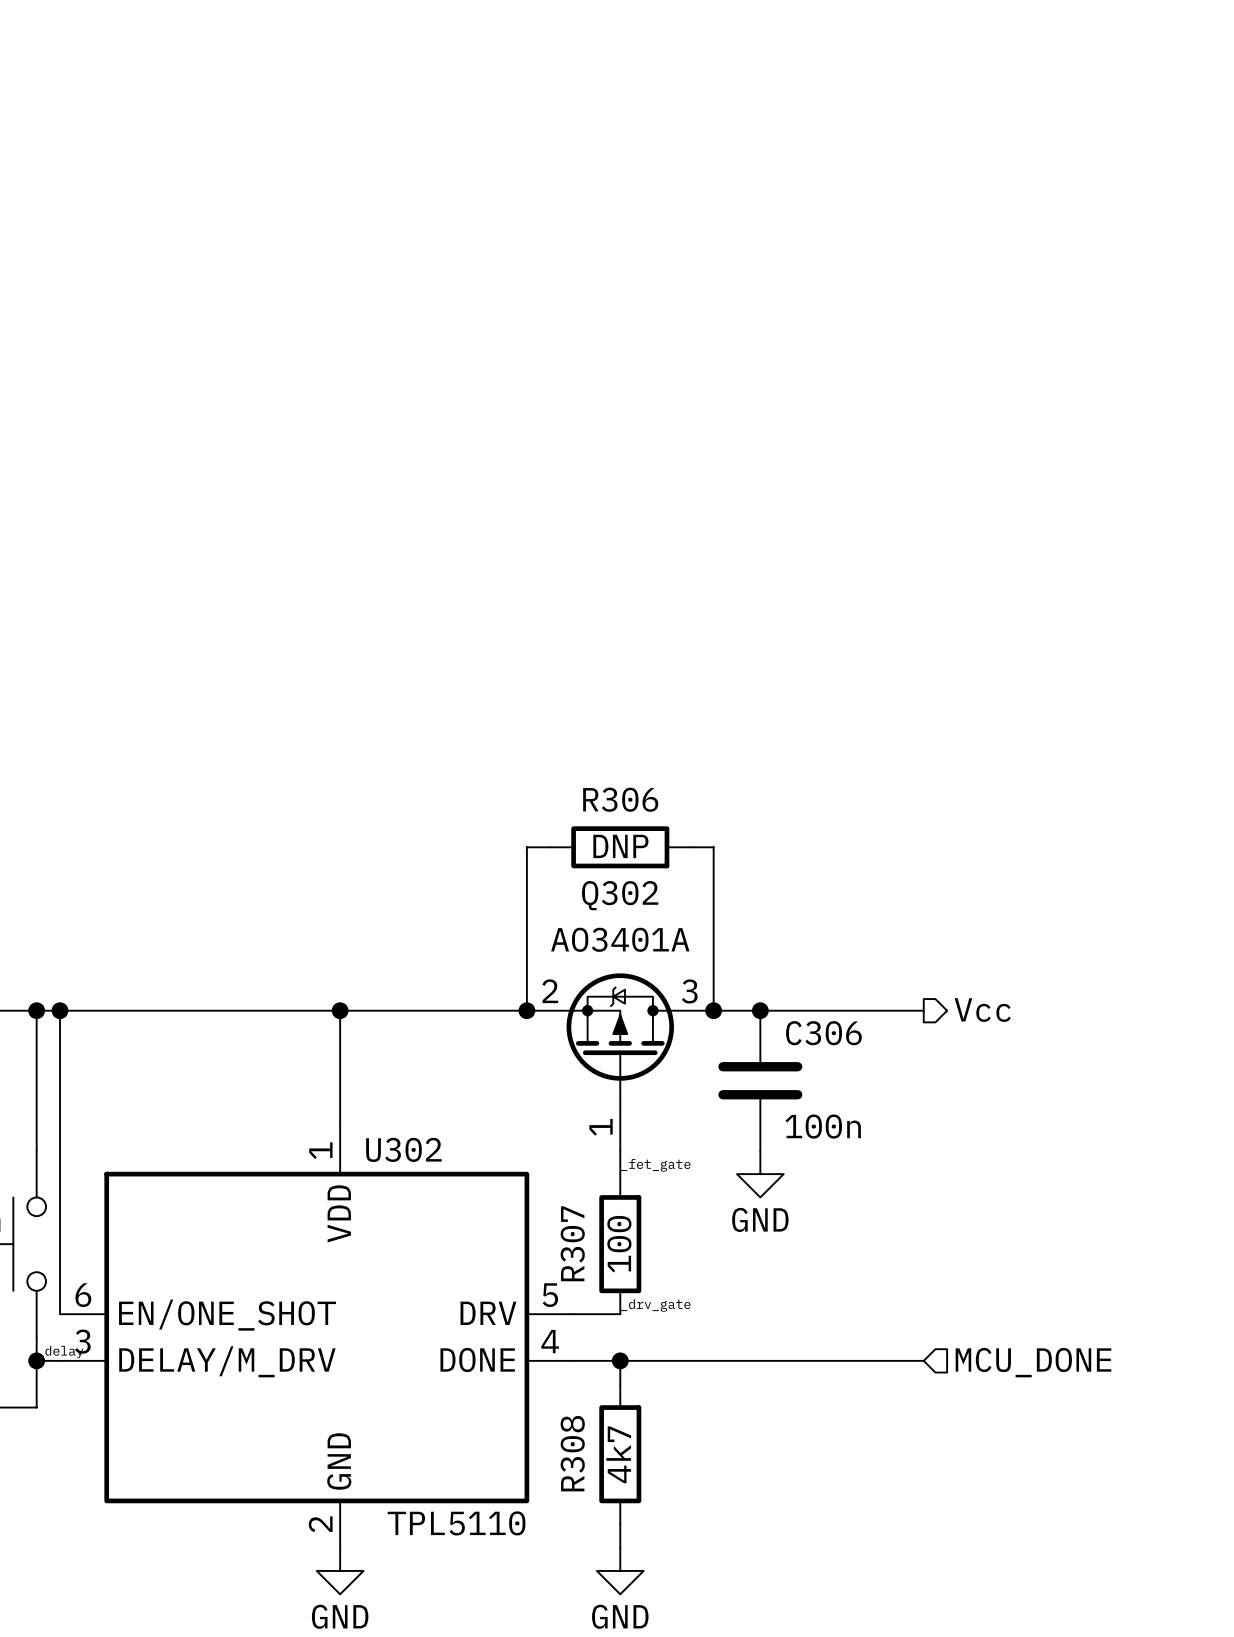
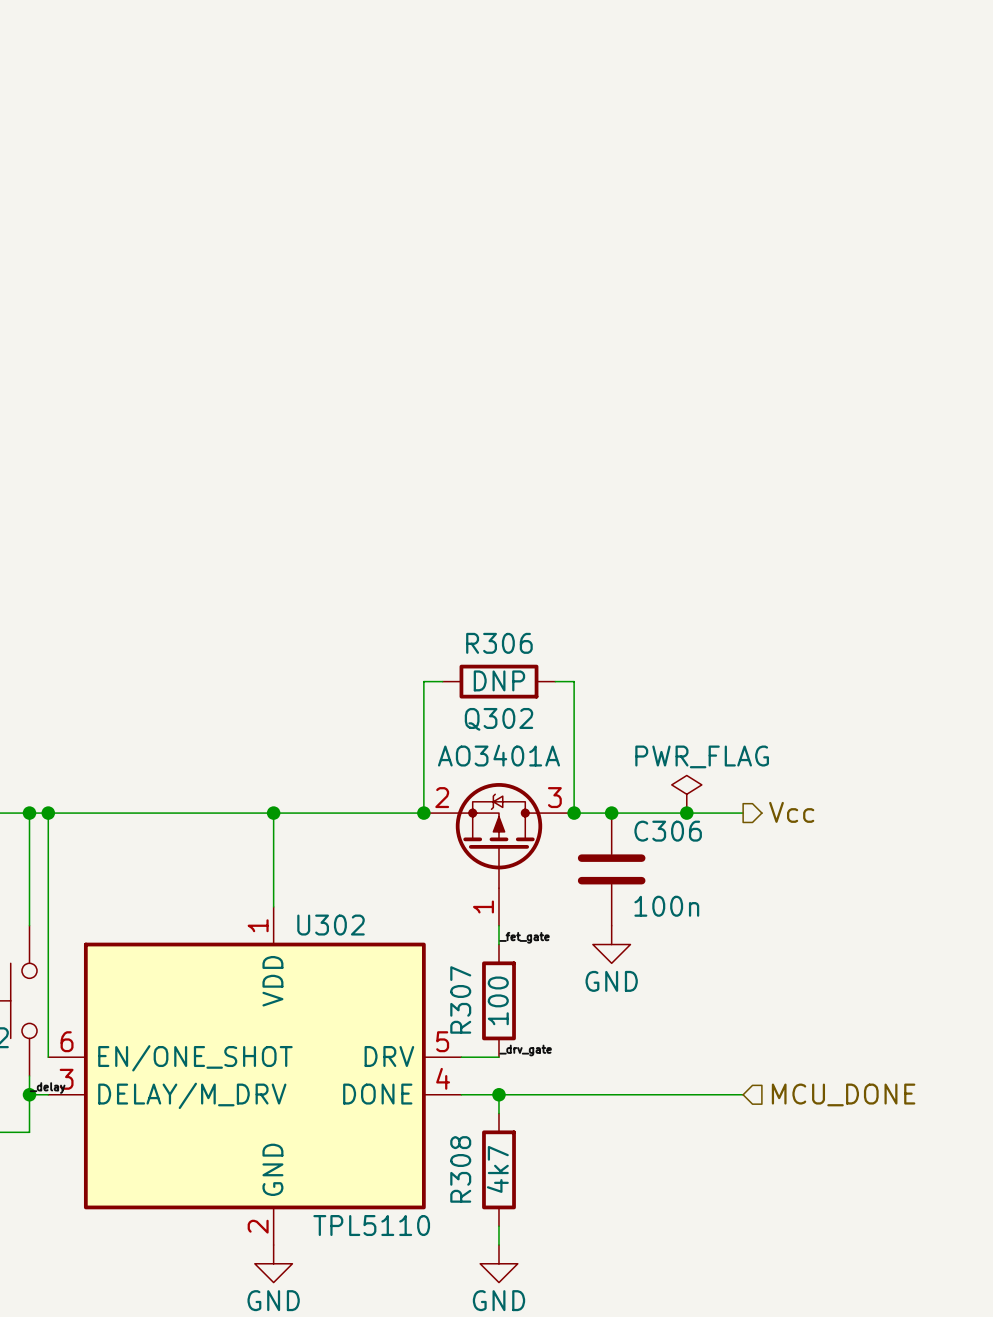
power symbol: none -> PWR_FLAG (686, 794)
junction: none -> (686, 813)

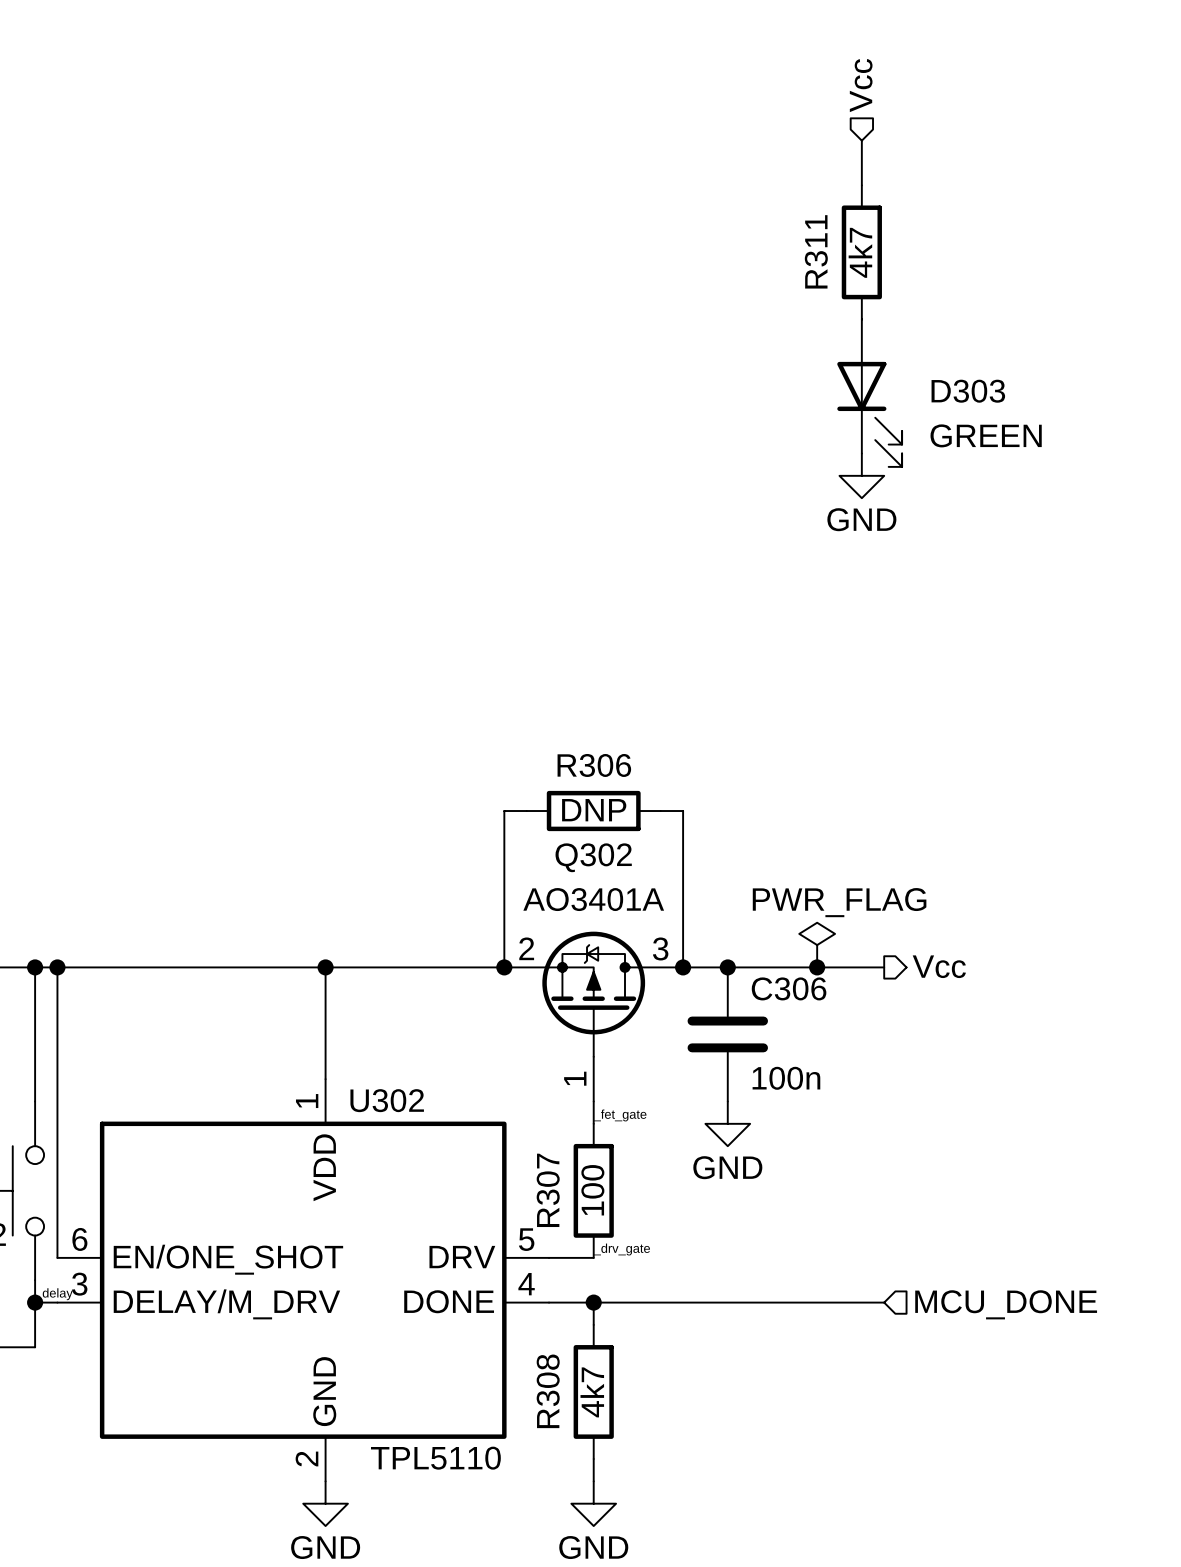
hierarchical label: none -> Vcc (861, 85)
wire: none -> (861, 140) (861, 185)
R311: none -> 4k7 (861, 252)
D303: none -> GREEN (869, 393)
power symbol: none -> GND (861, 475)

